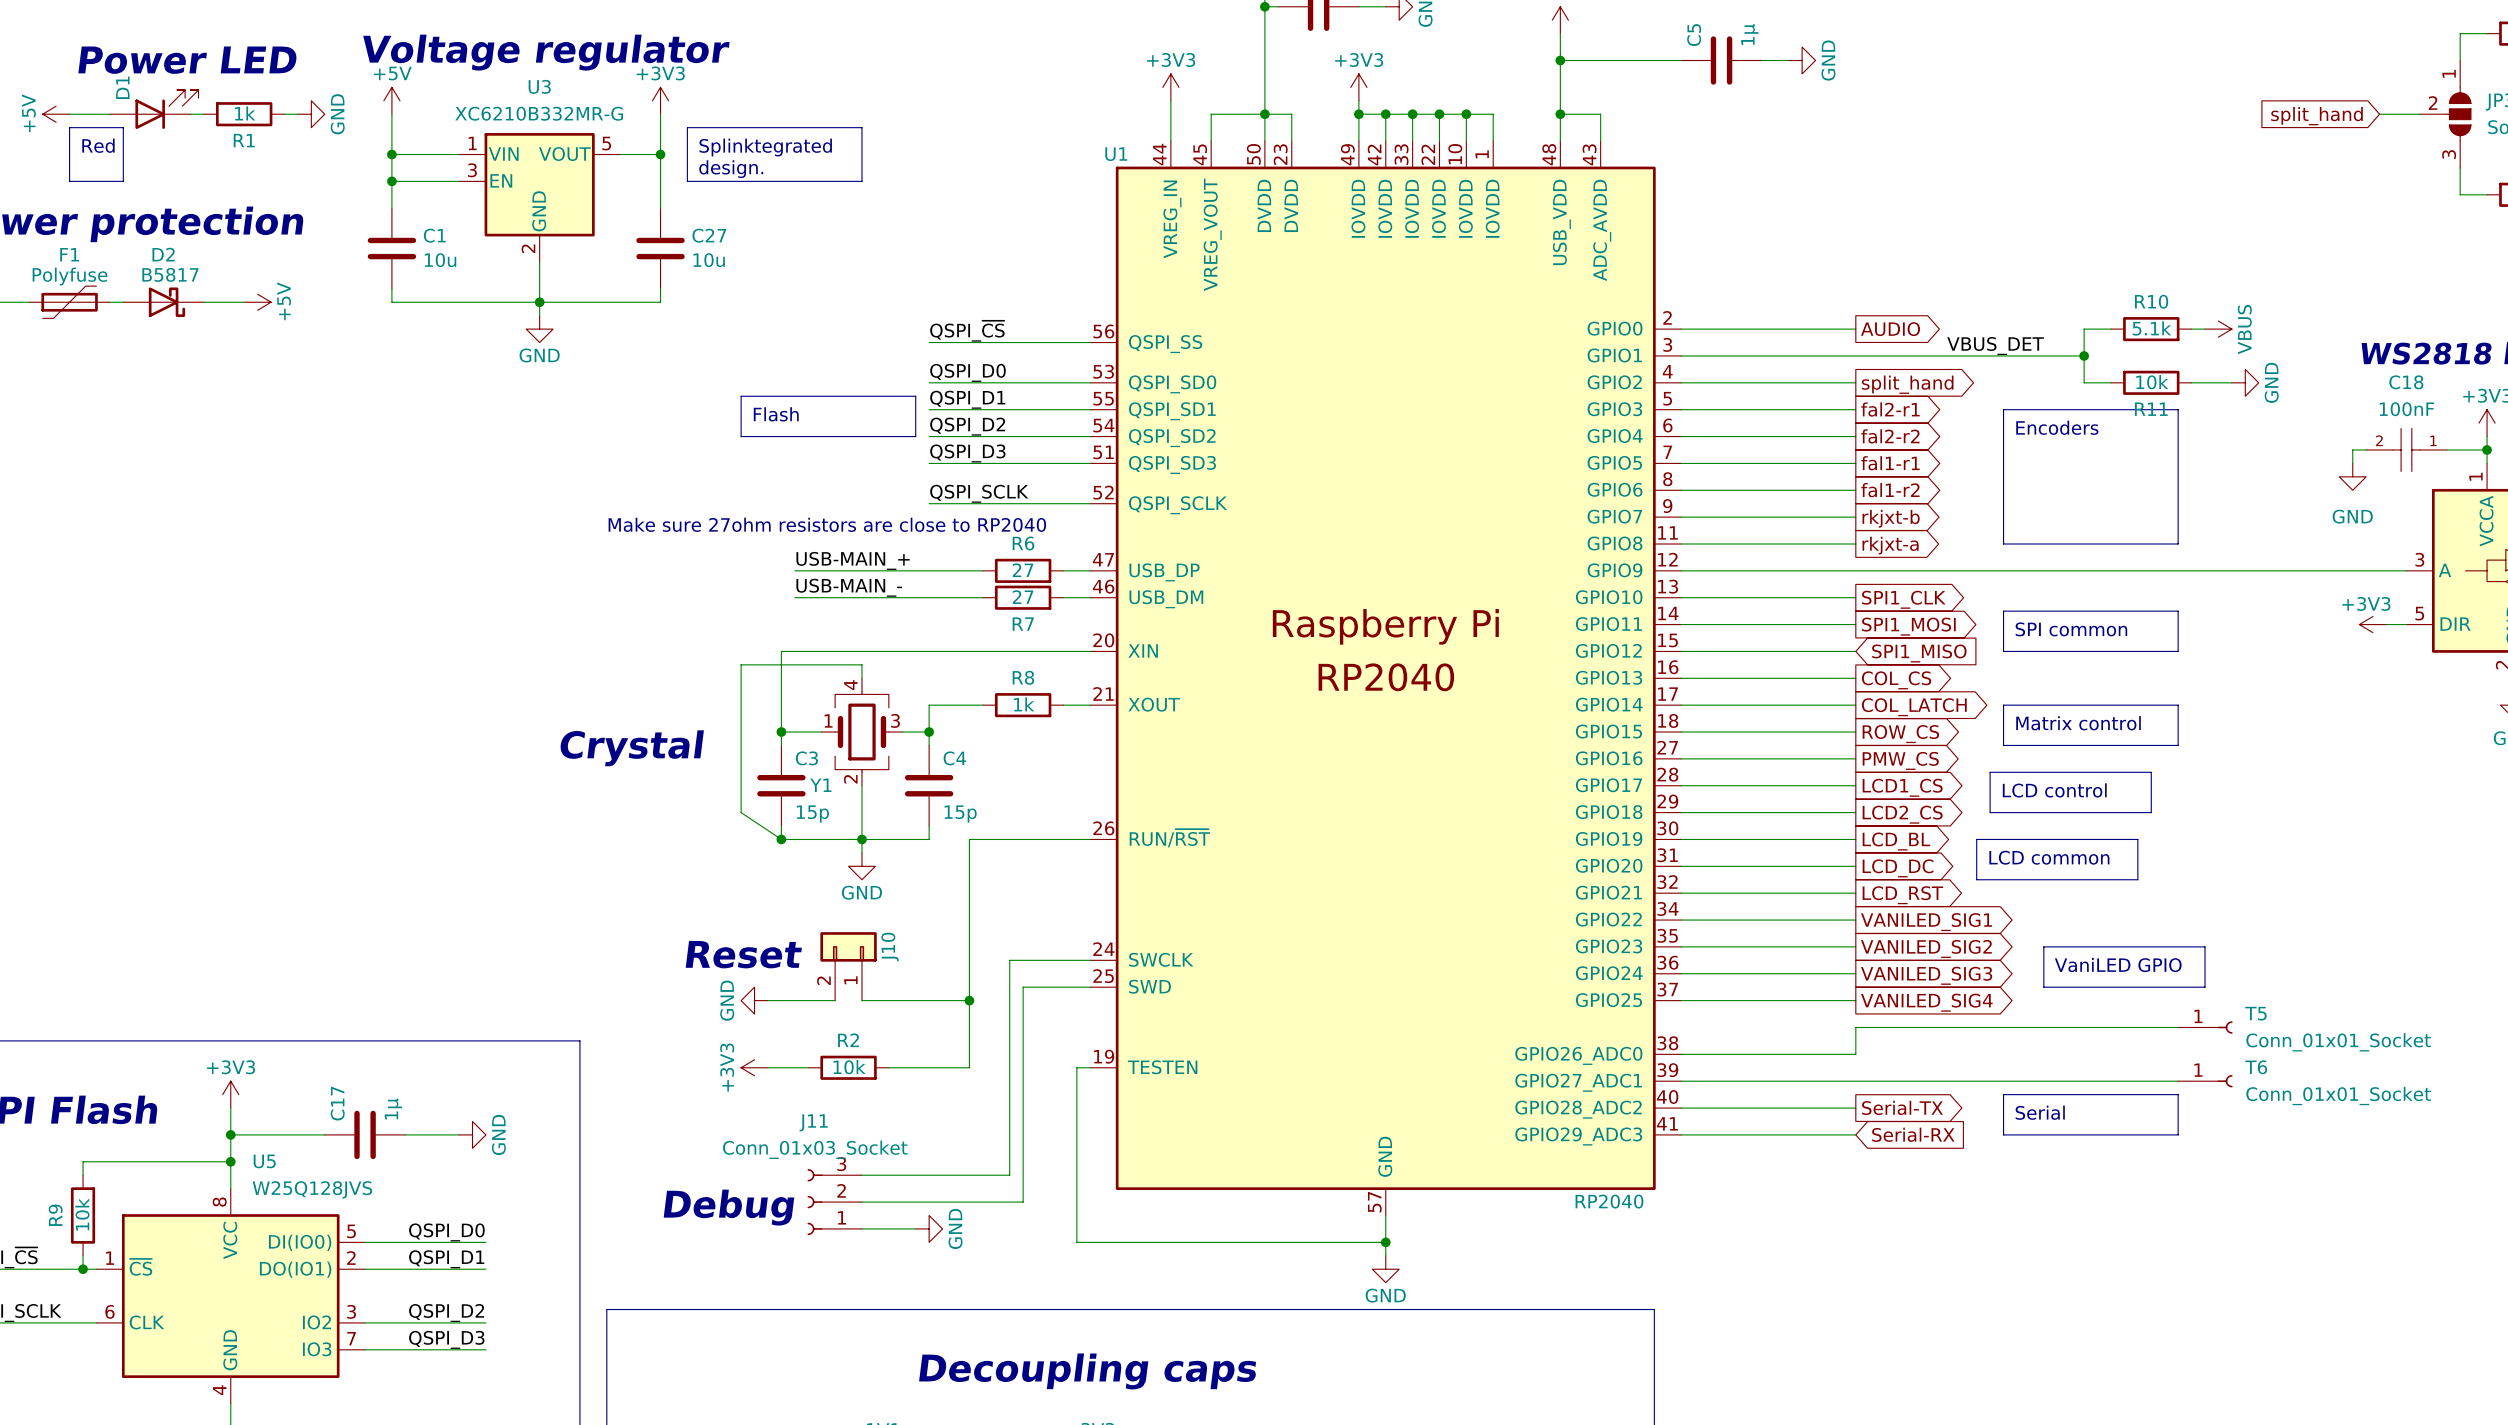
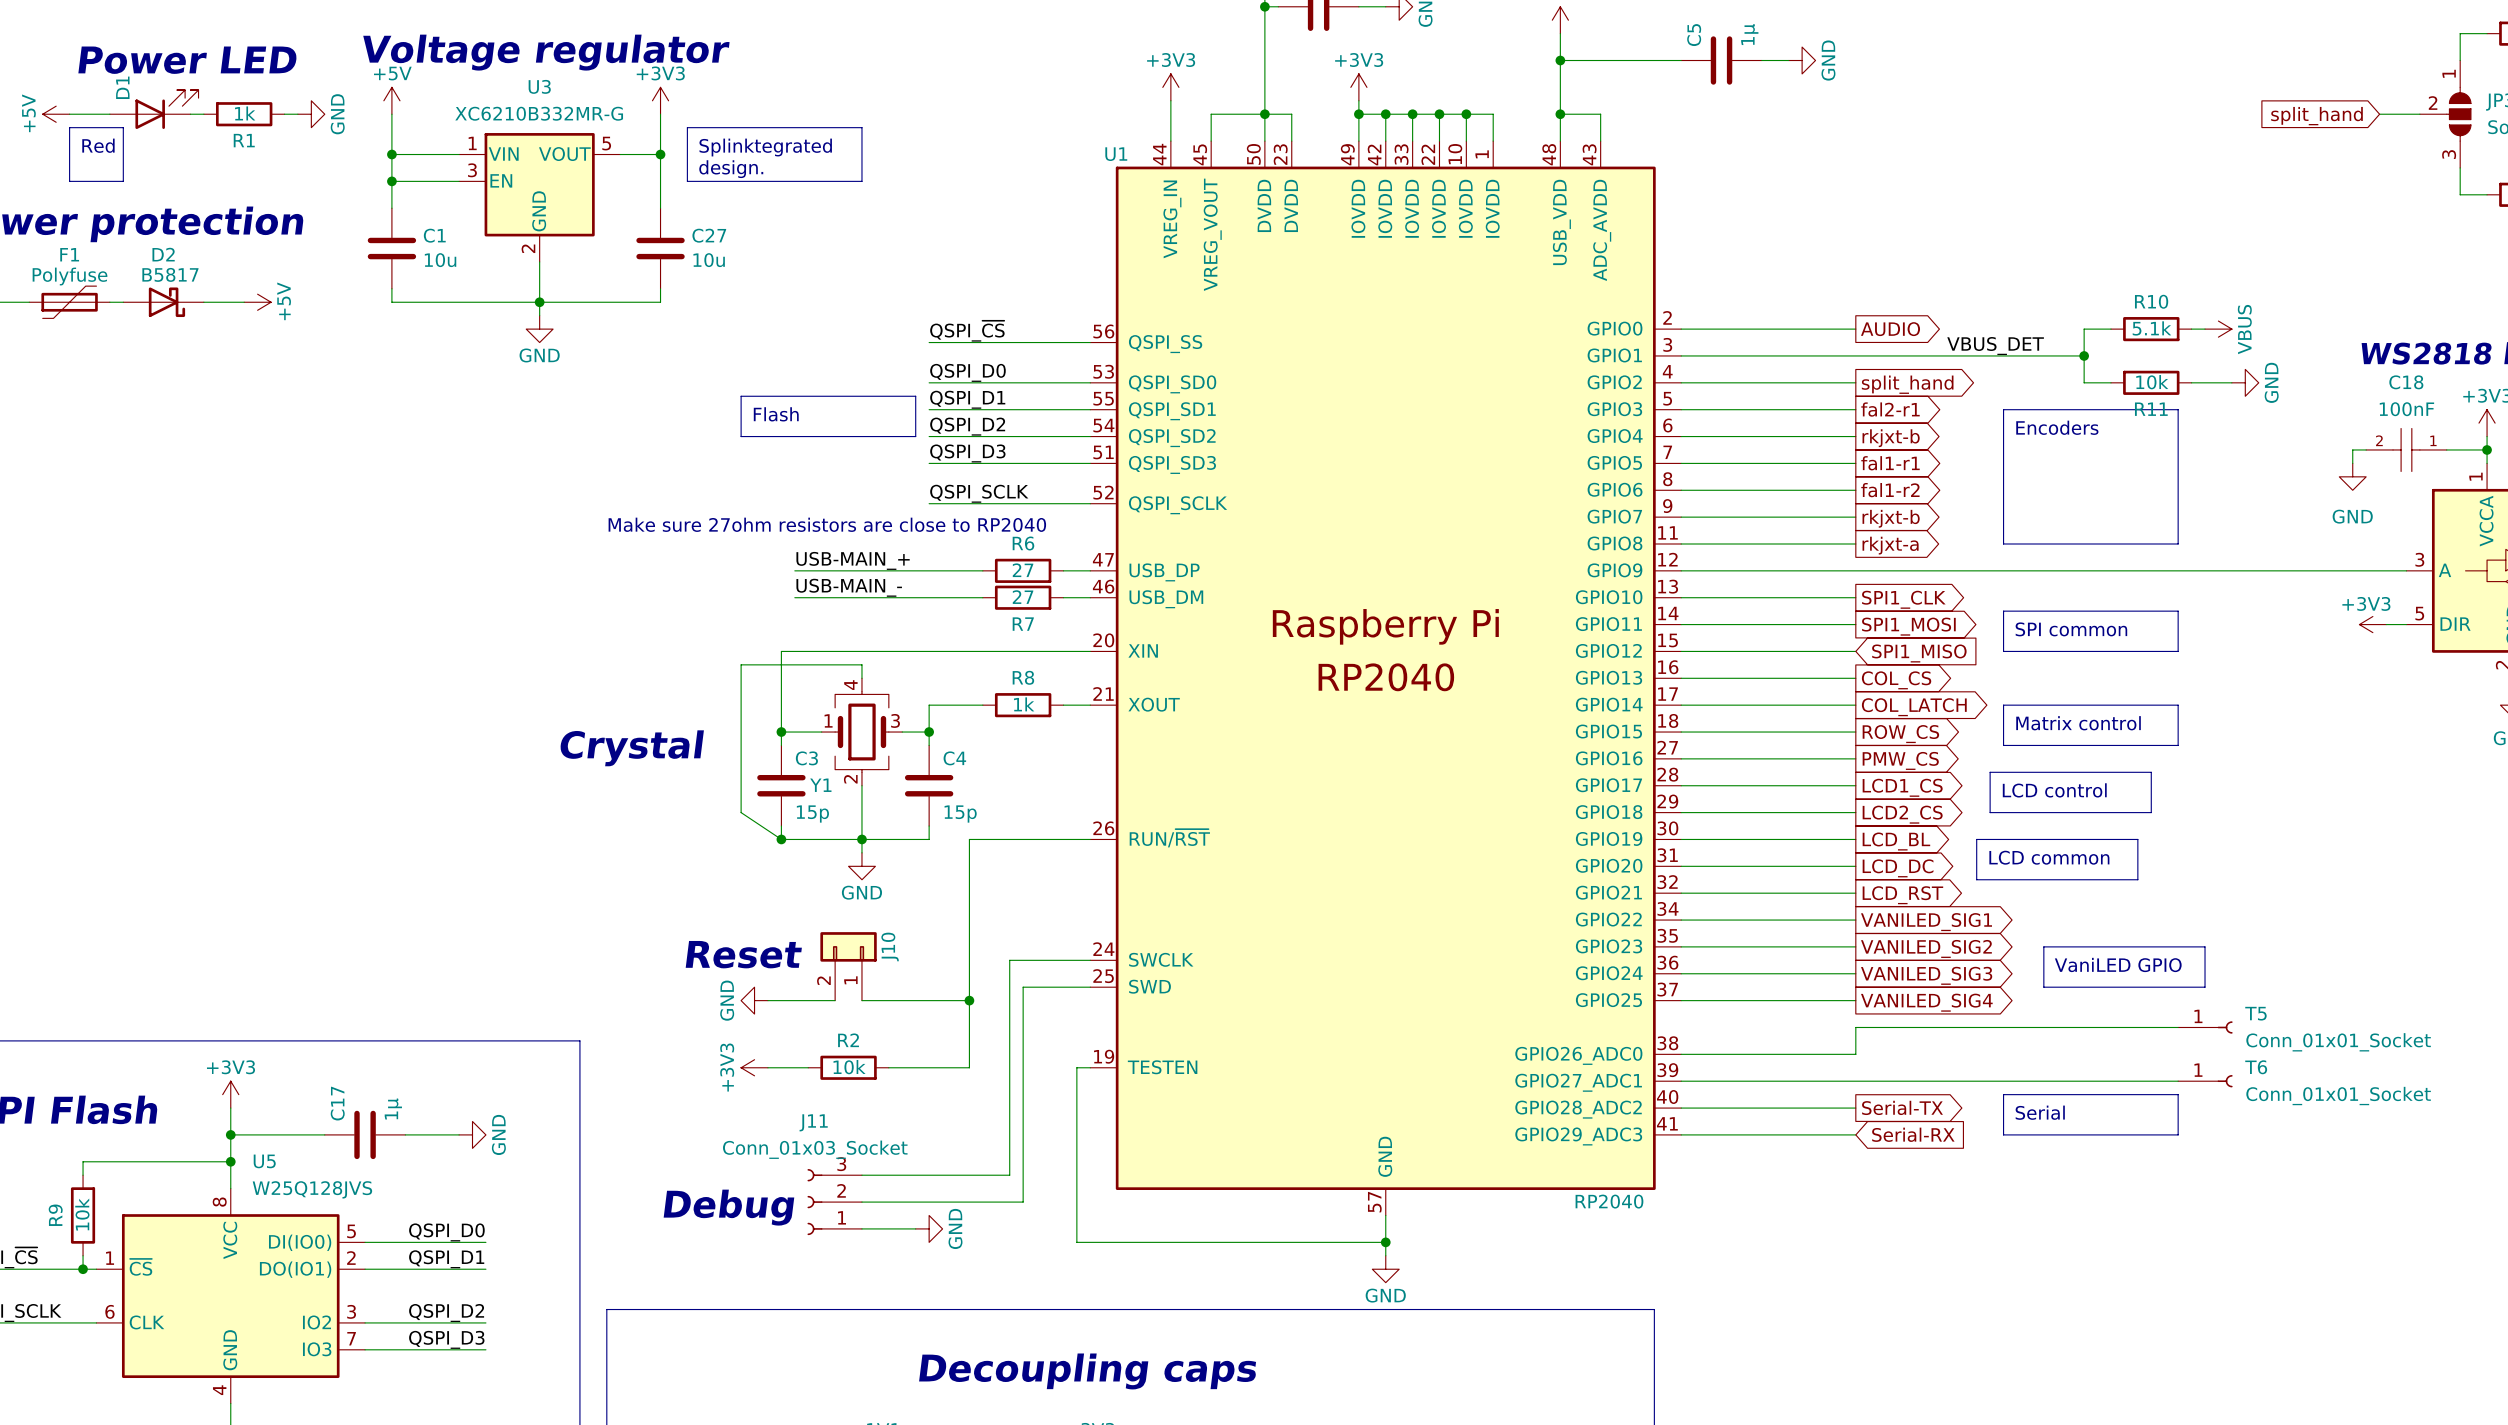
global label: fal2-r2 (1890, 436) -> rkjxt-b (1891, 438)

